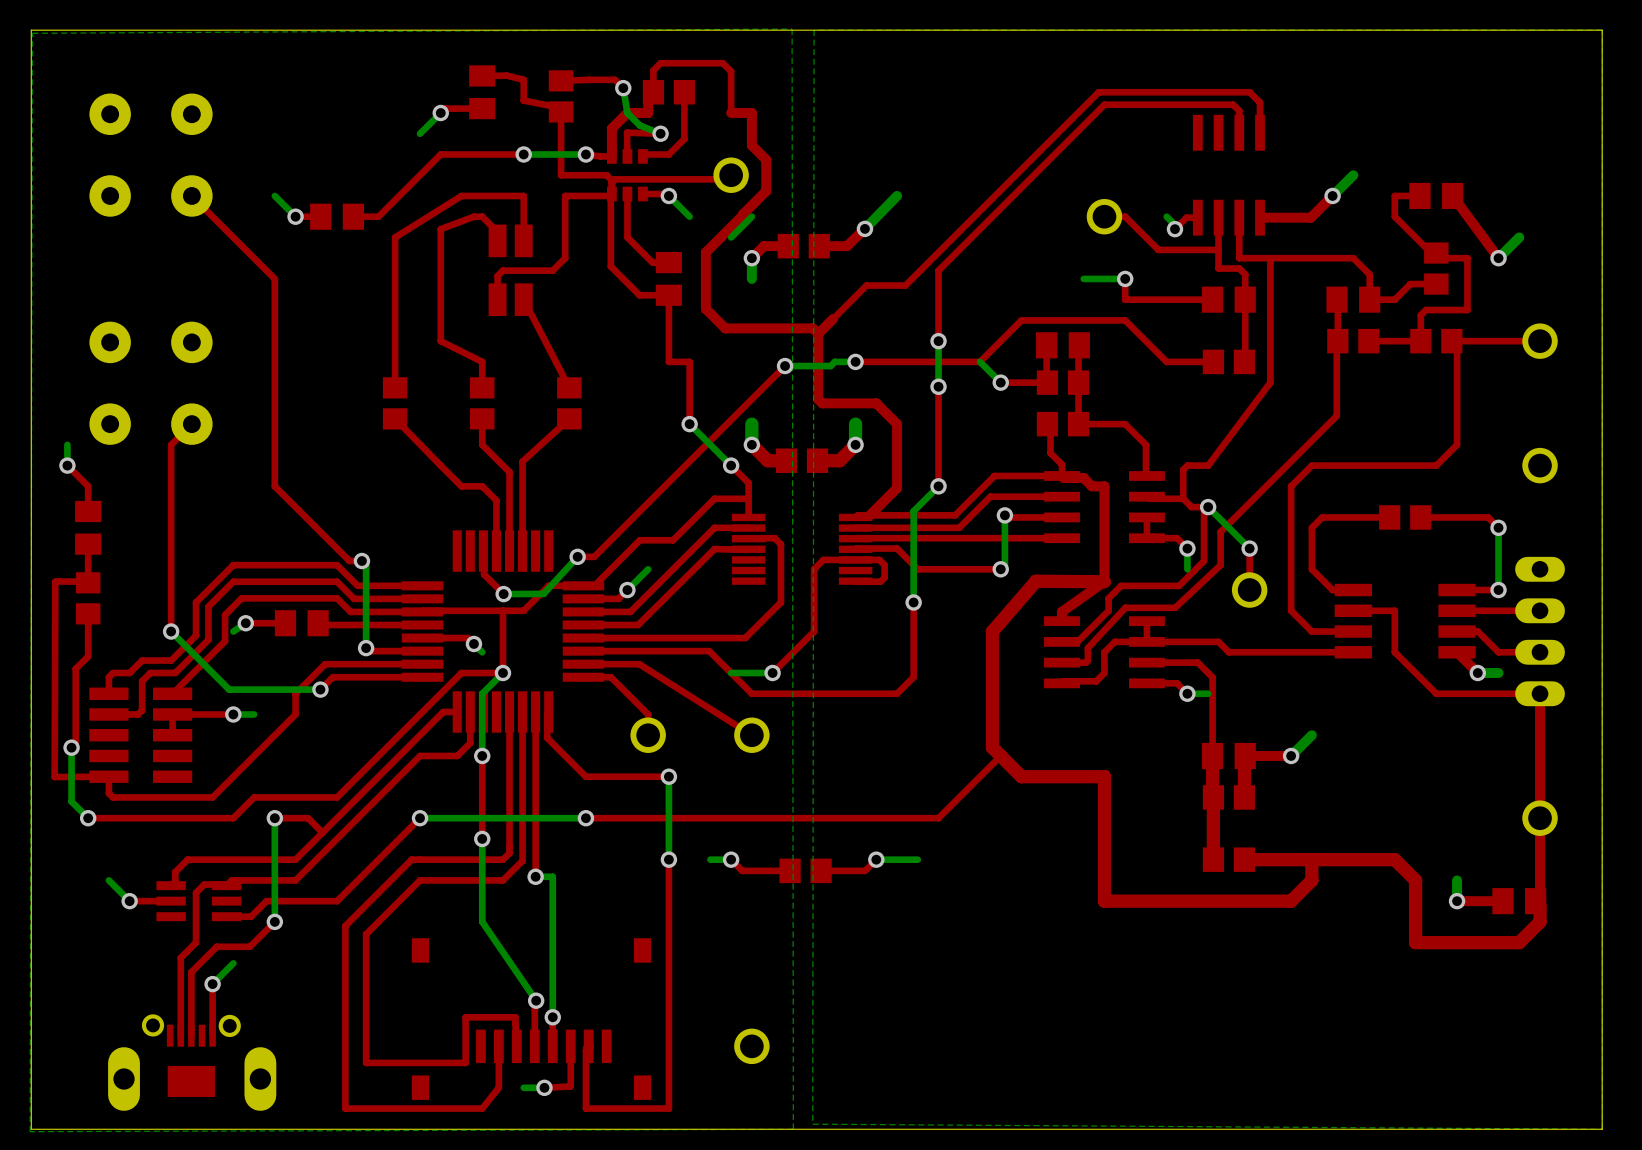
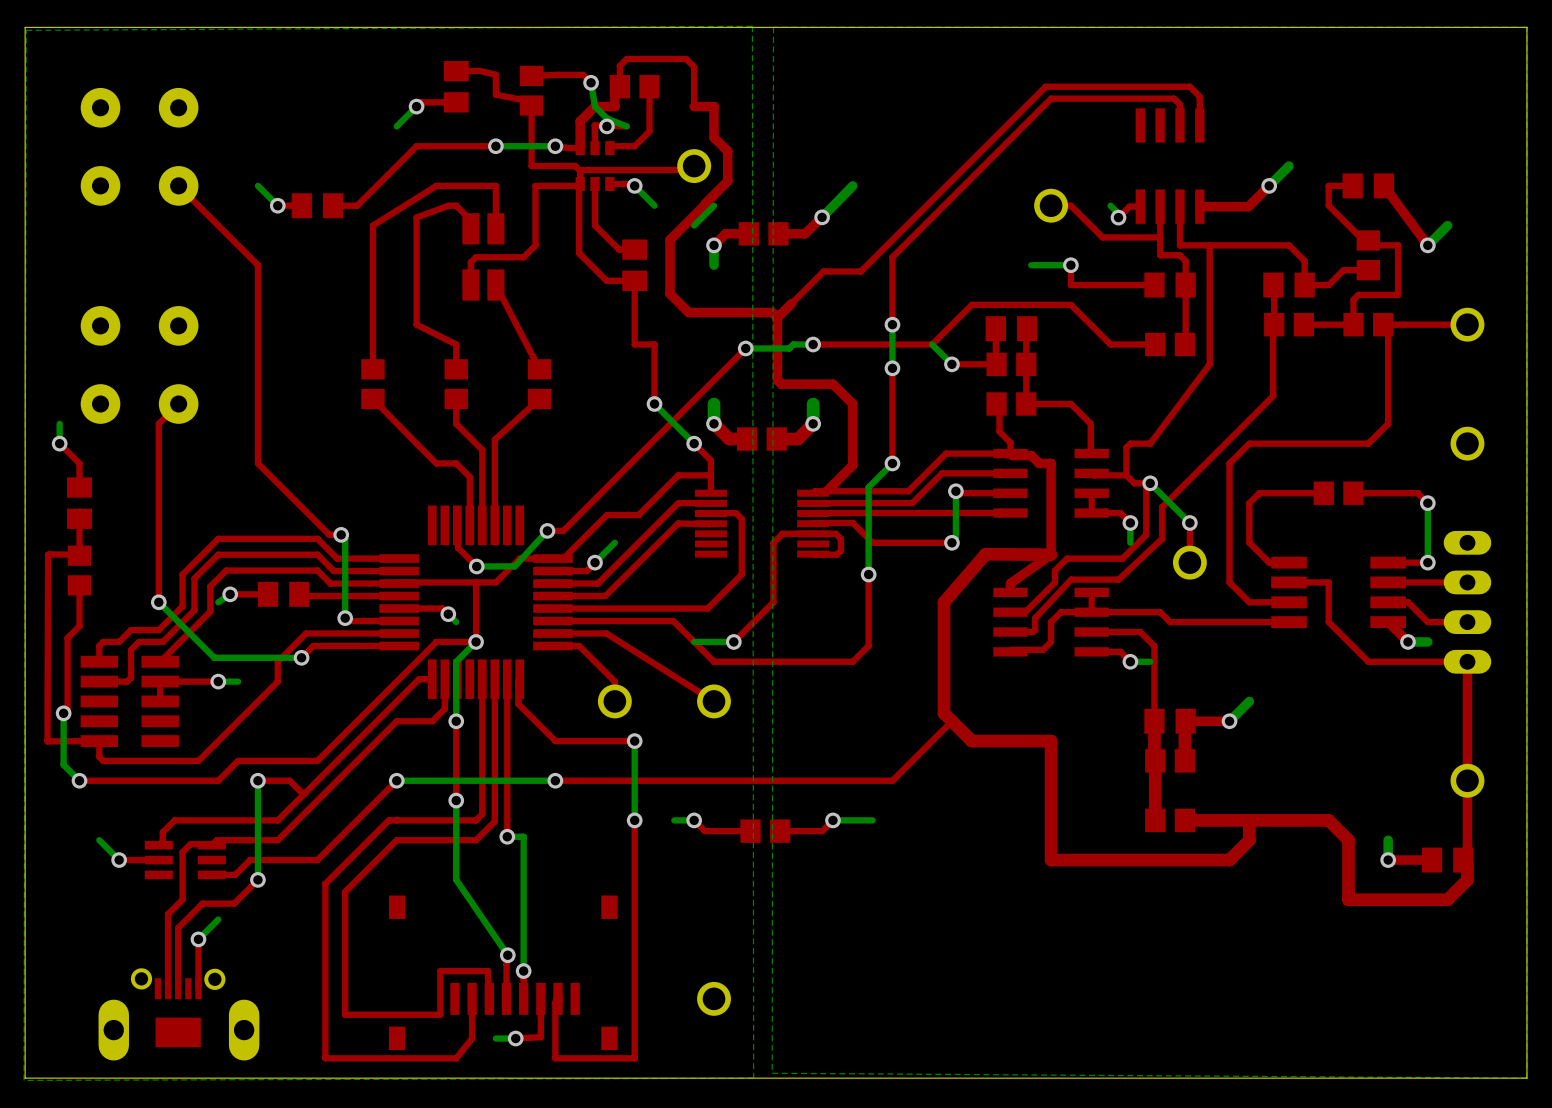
via position: (660, 133) -> (606, 126)

